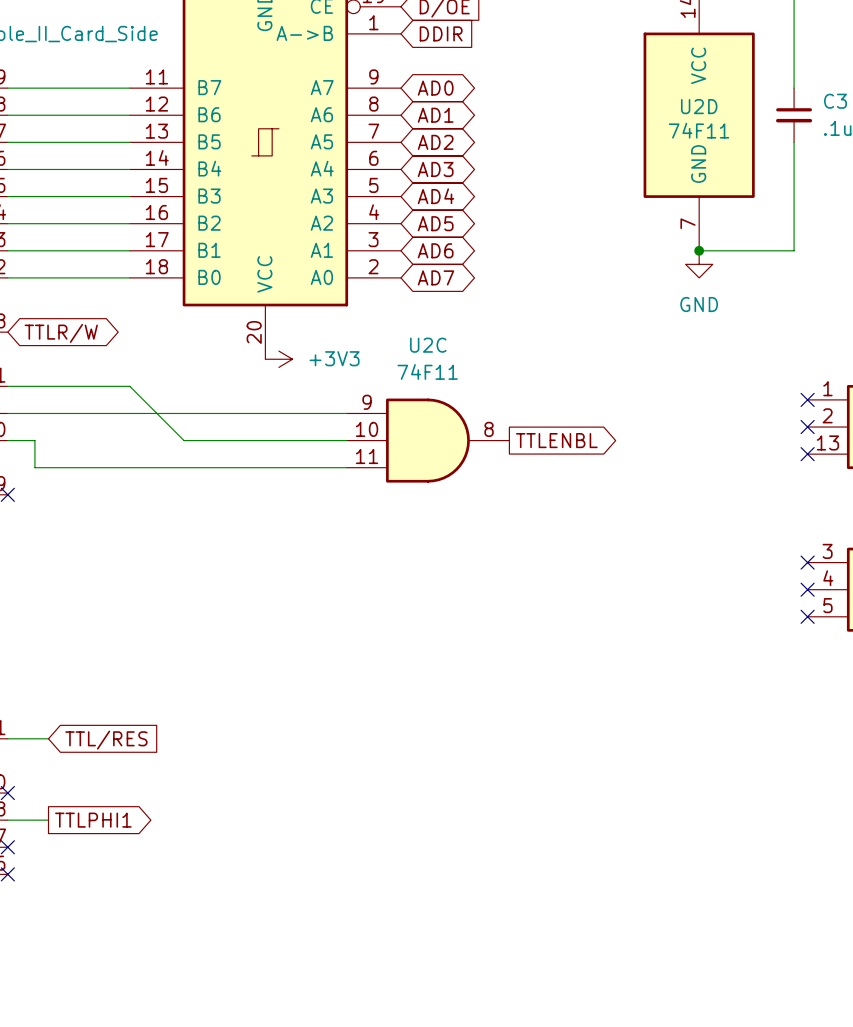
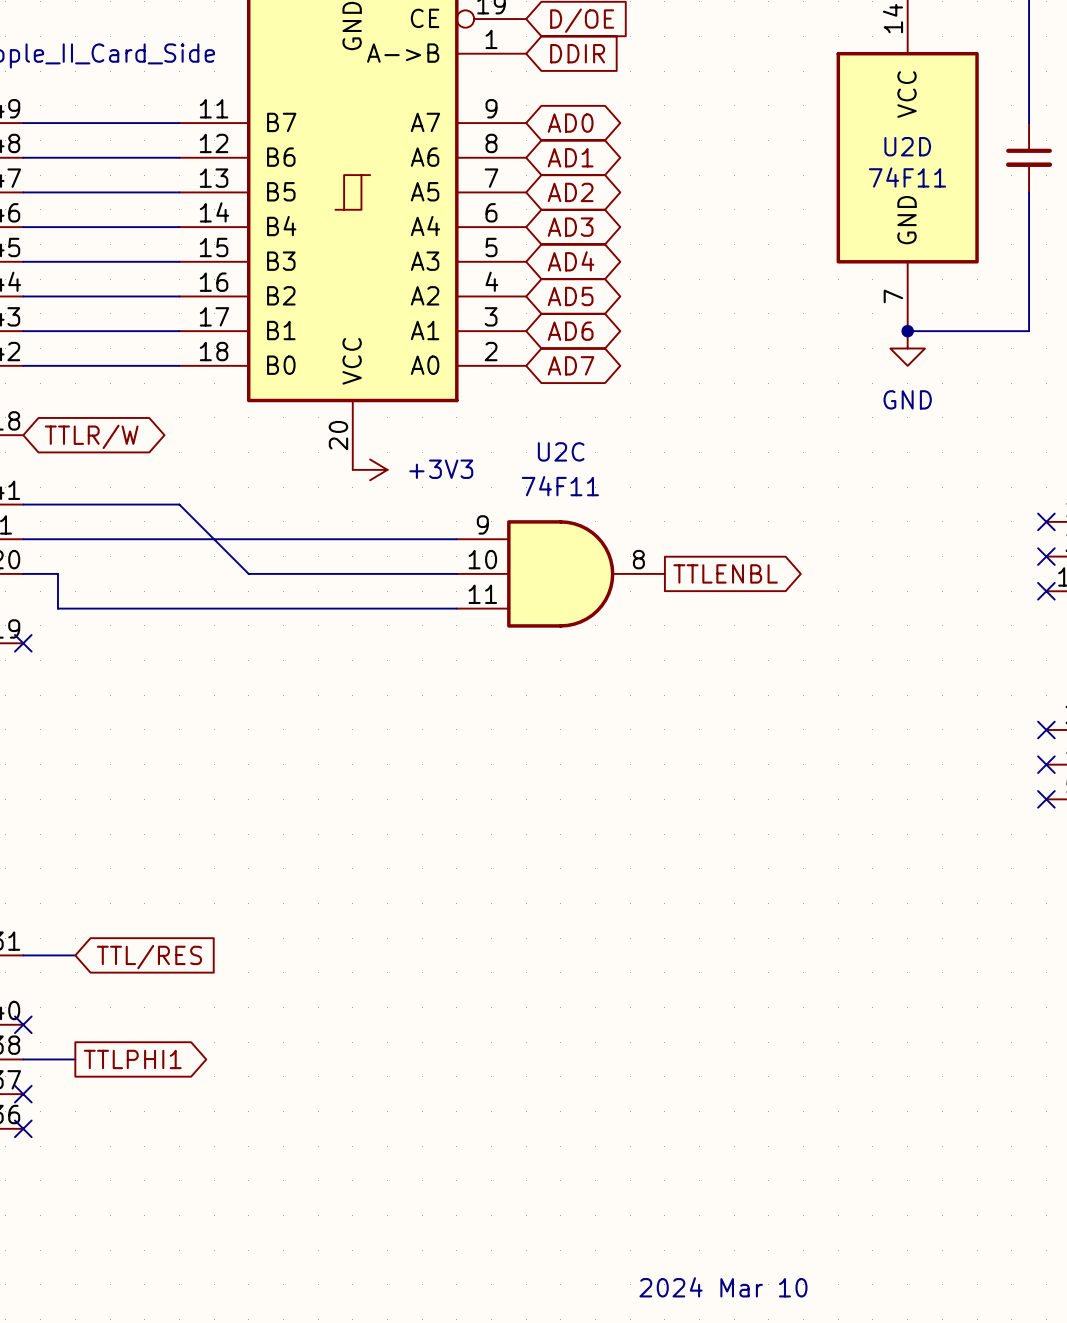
text: none -> 2024 Mar 10 (723, 1287)

